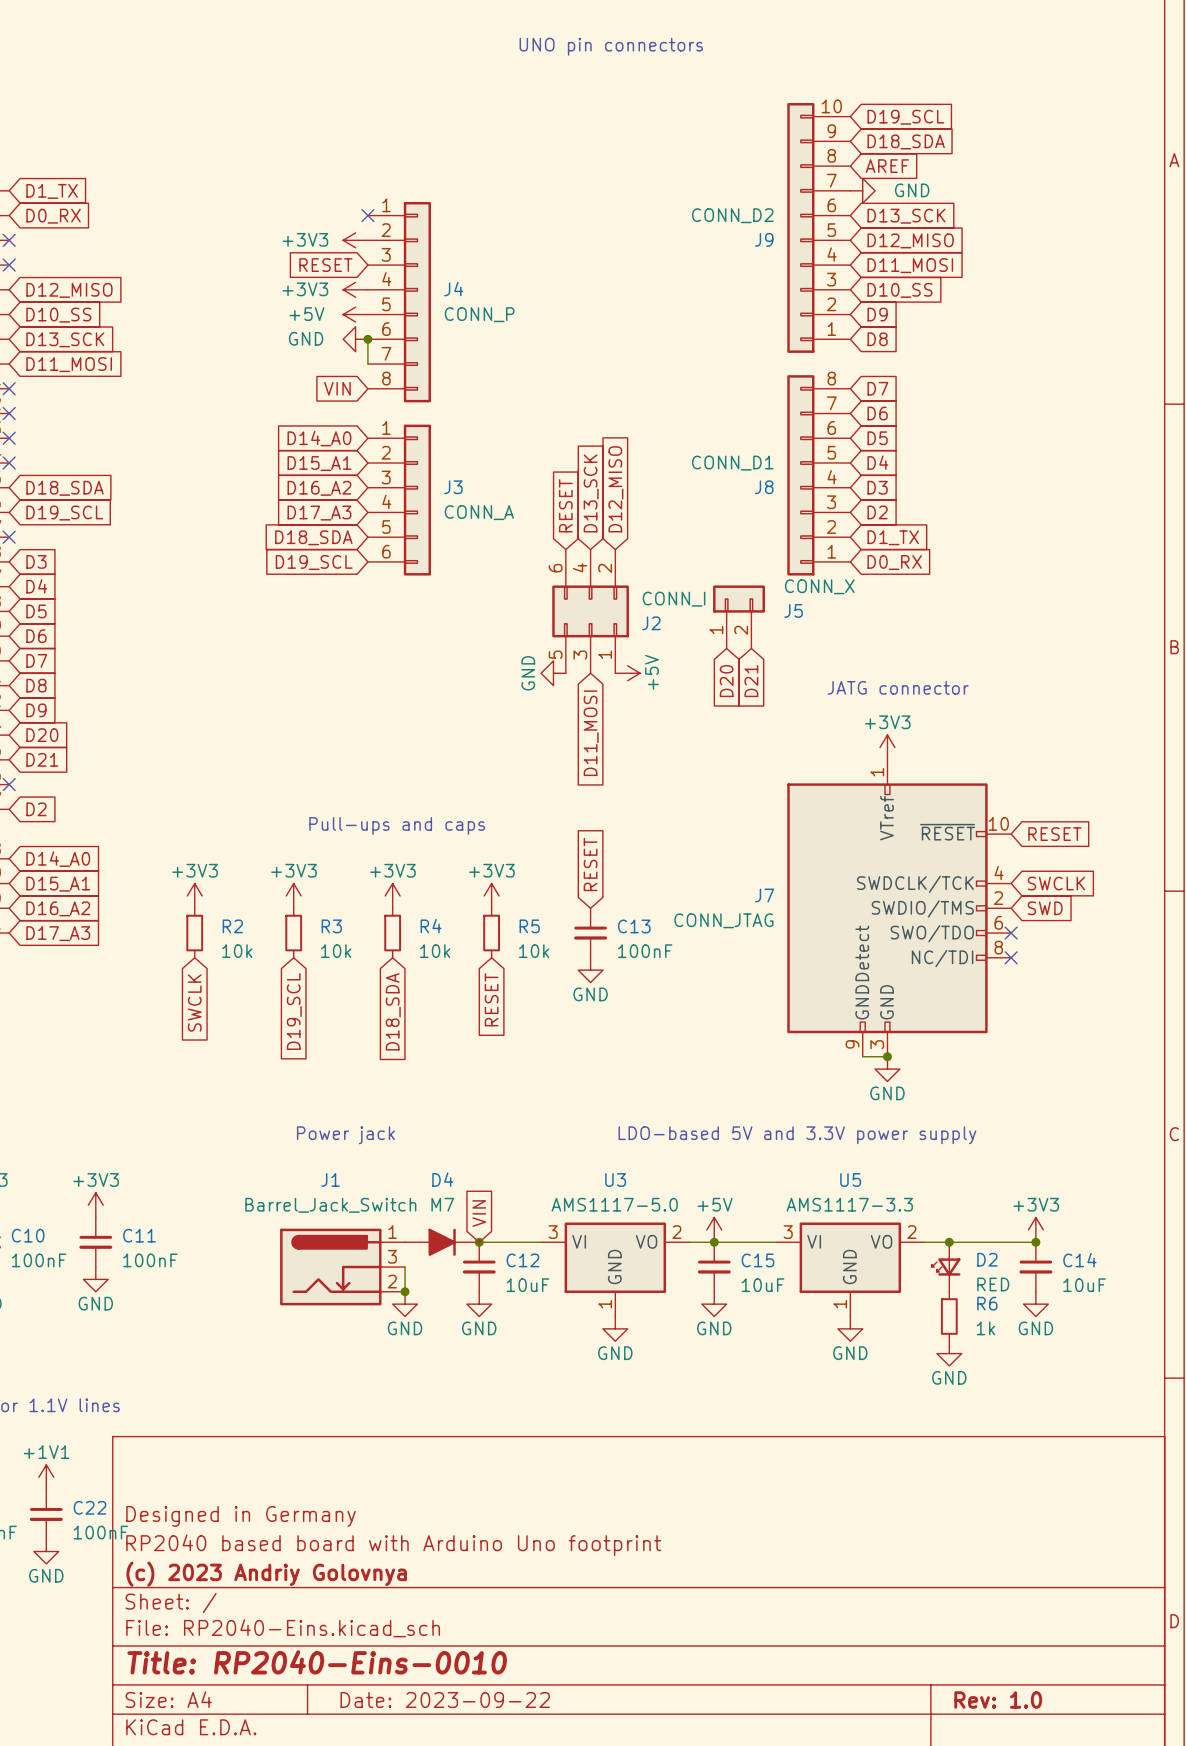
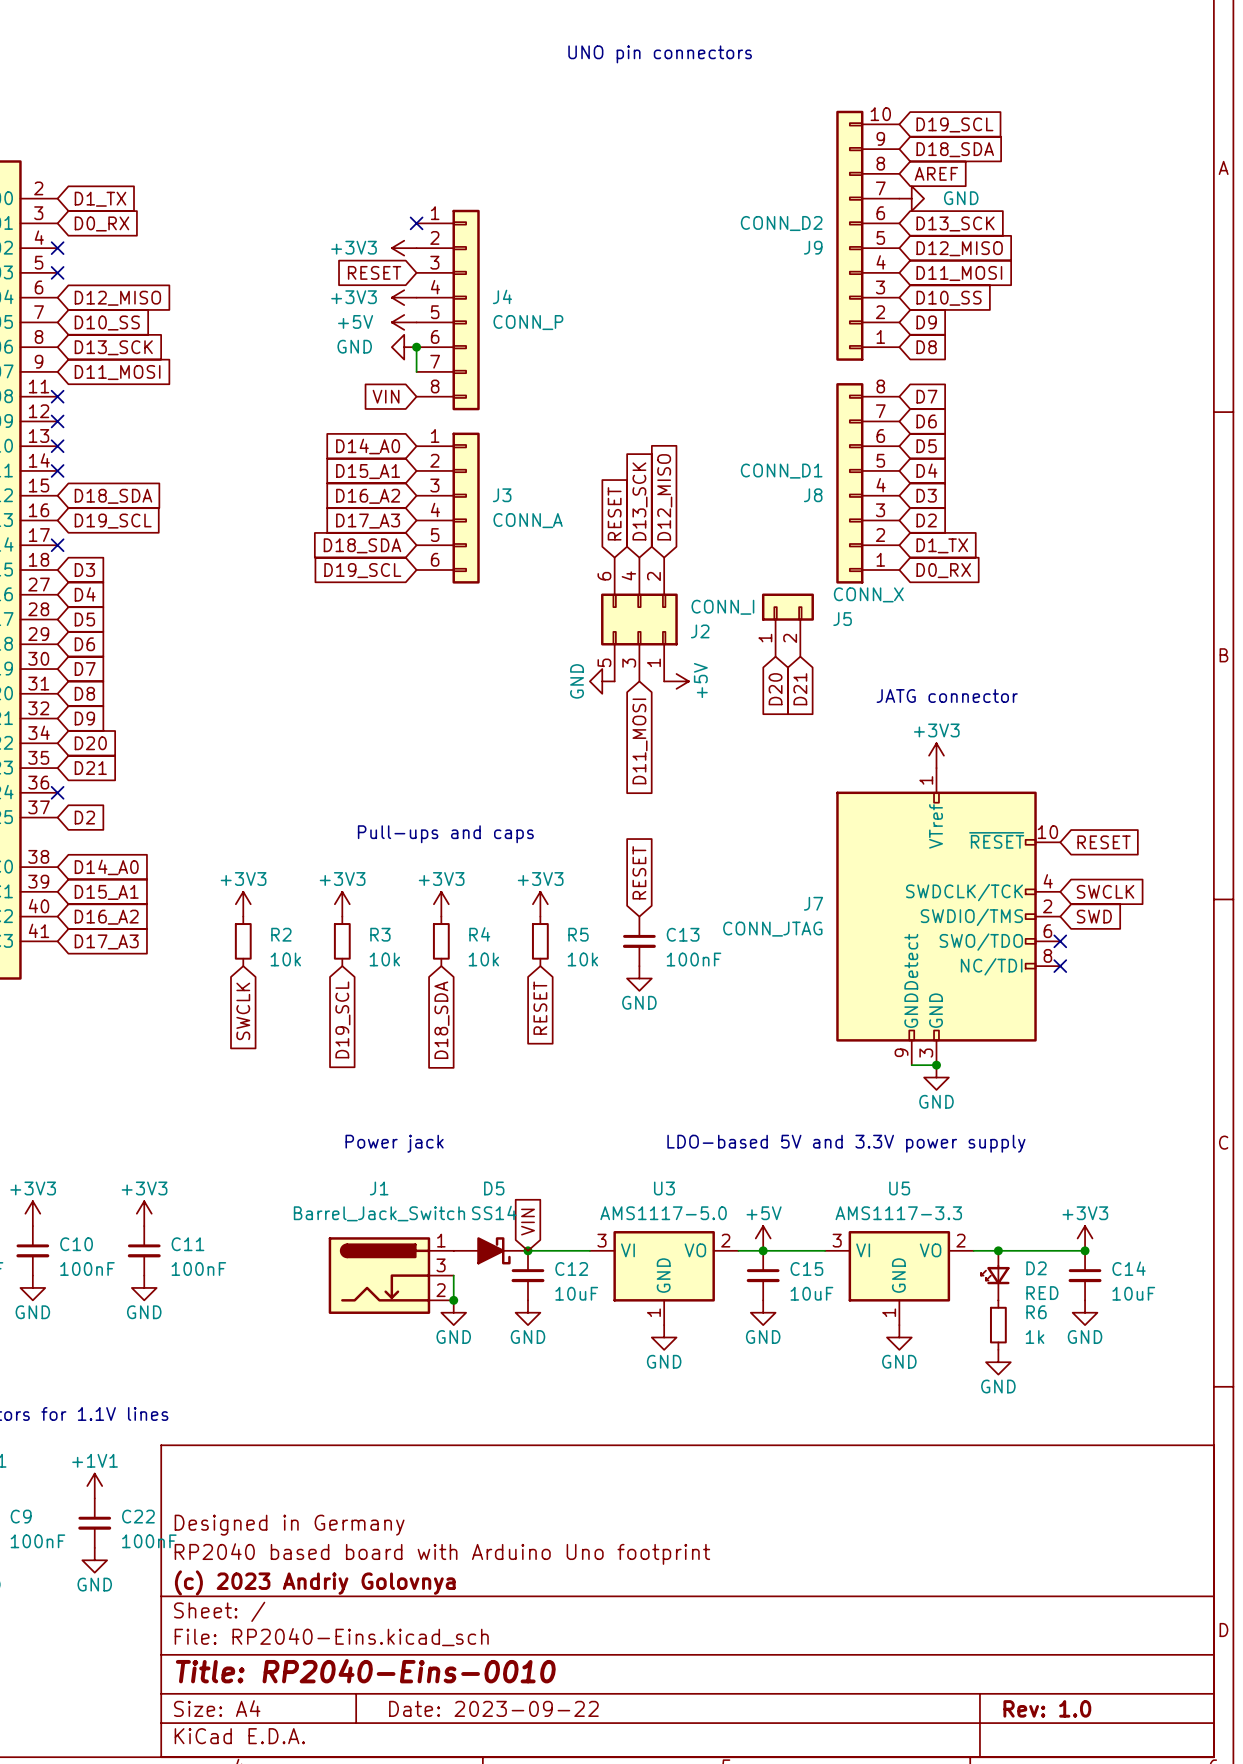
D4: M7 (442, 1242) -> none
D5: none -> SS14 (490, 1250)

